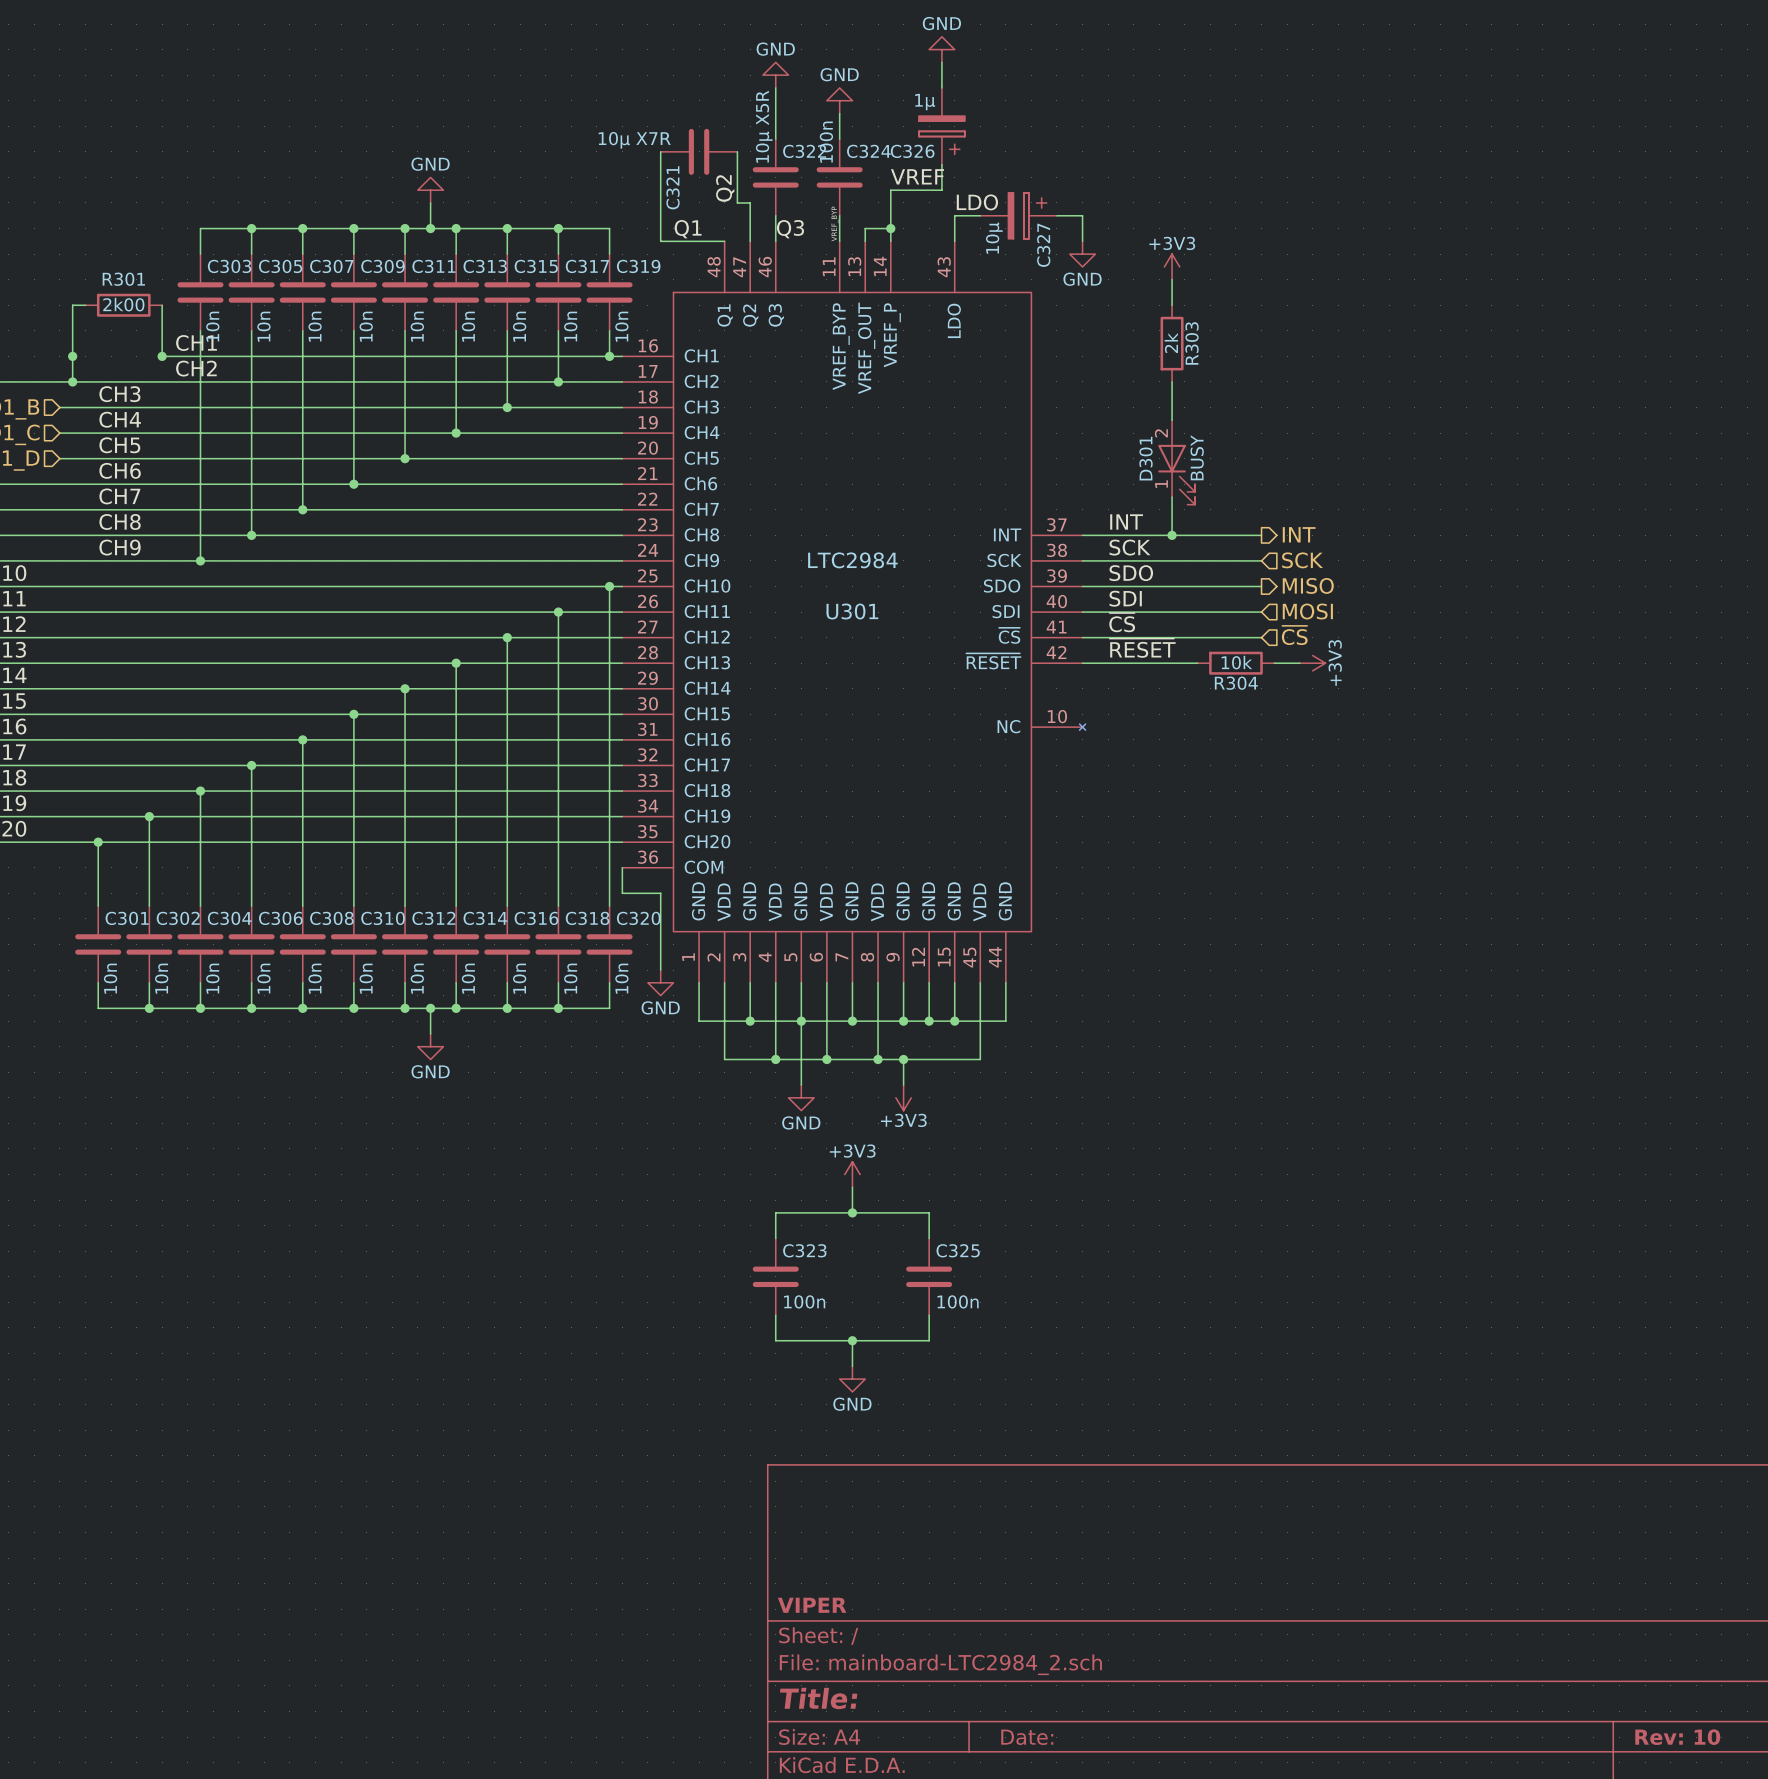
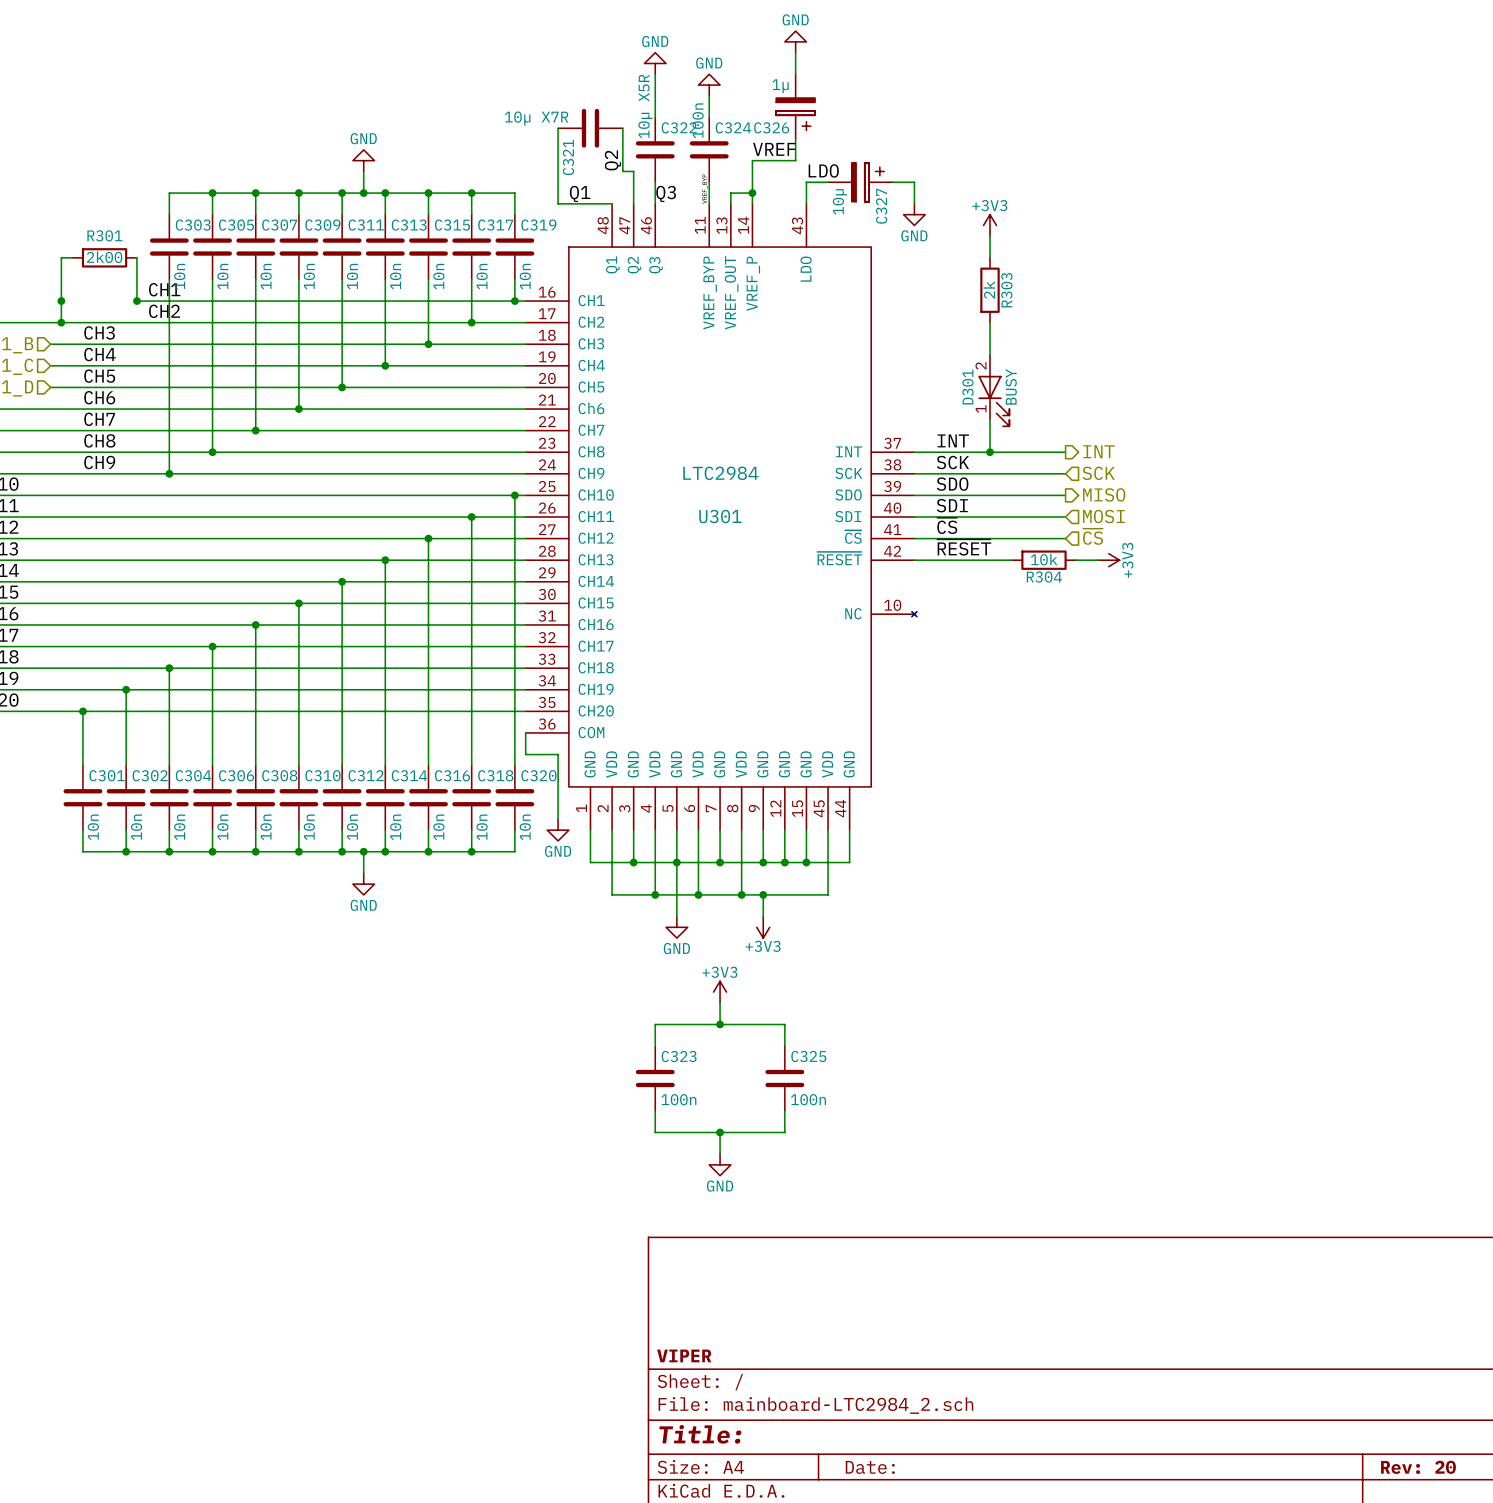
title block: Rev: 10 (1677, 1737) -> Rev: 20 (1418, 1467)

